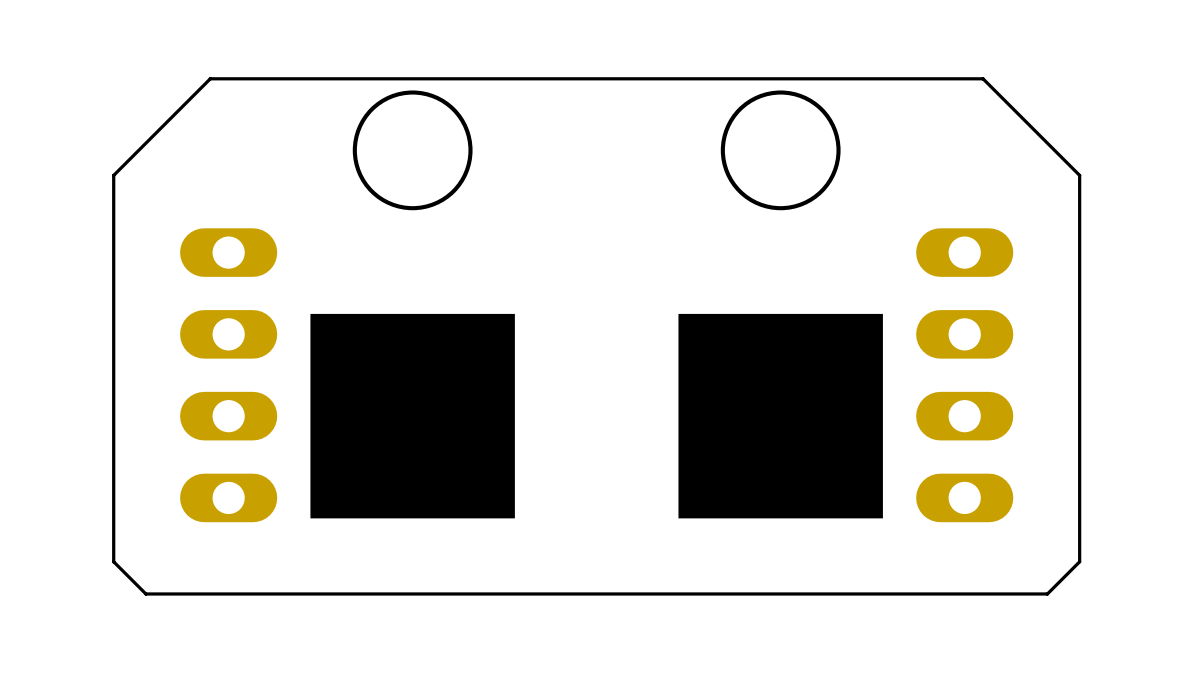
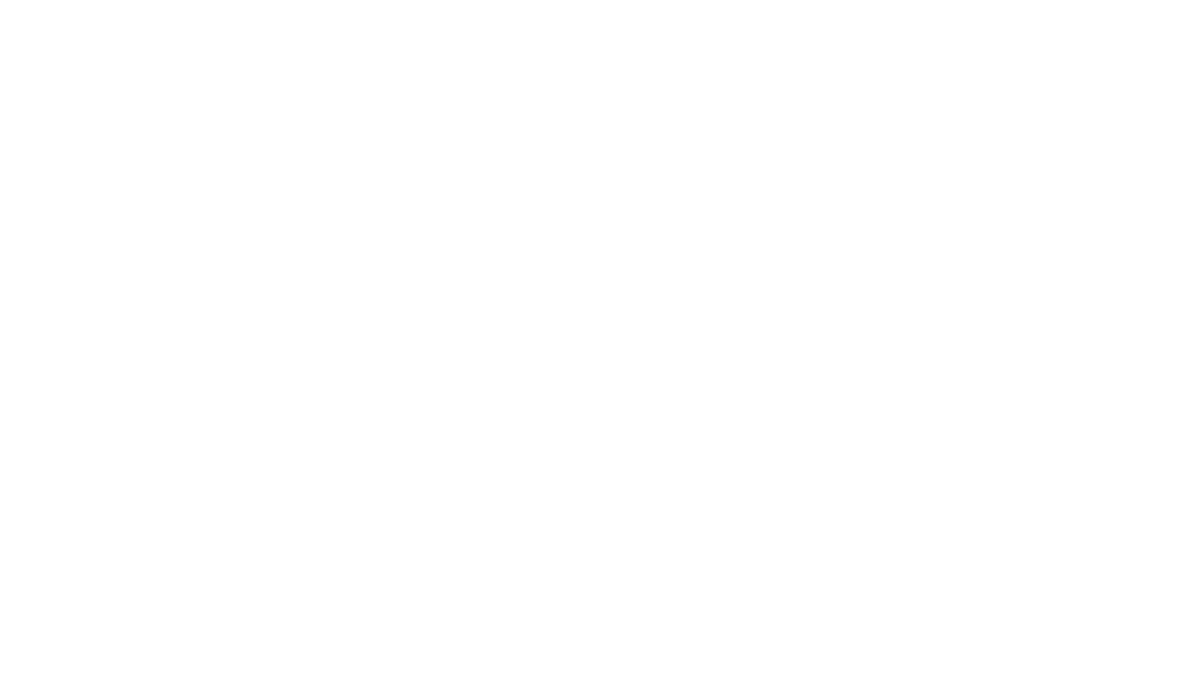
part: (596, 336) -> none

